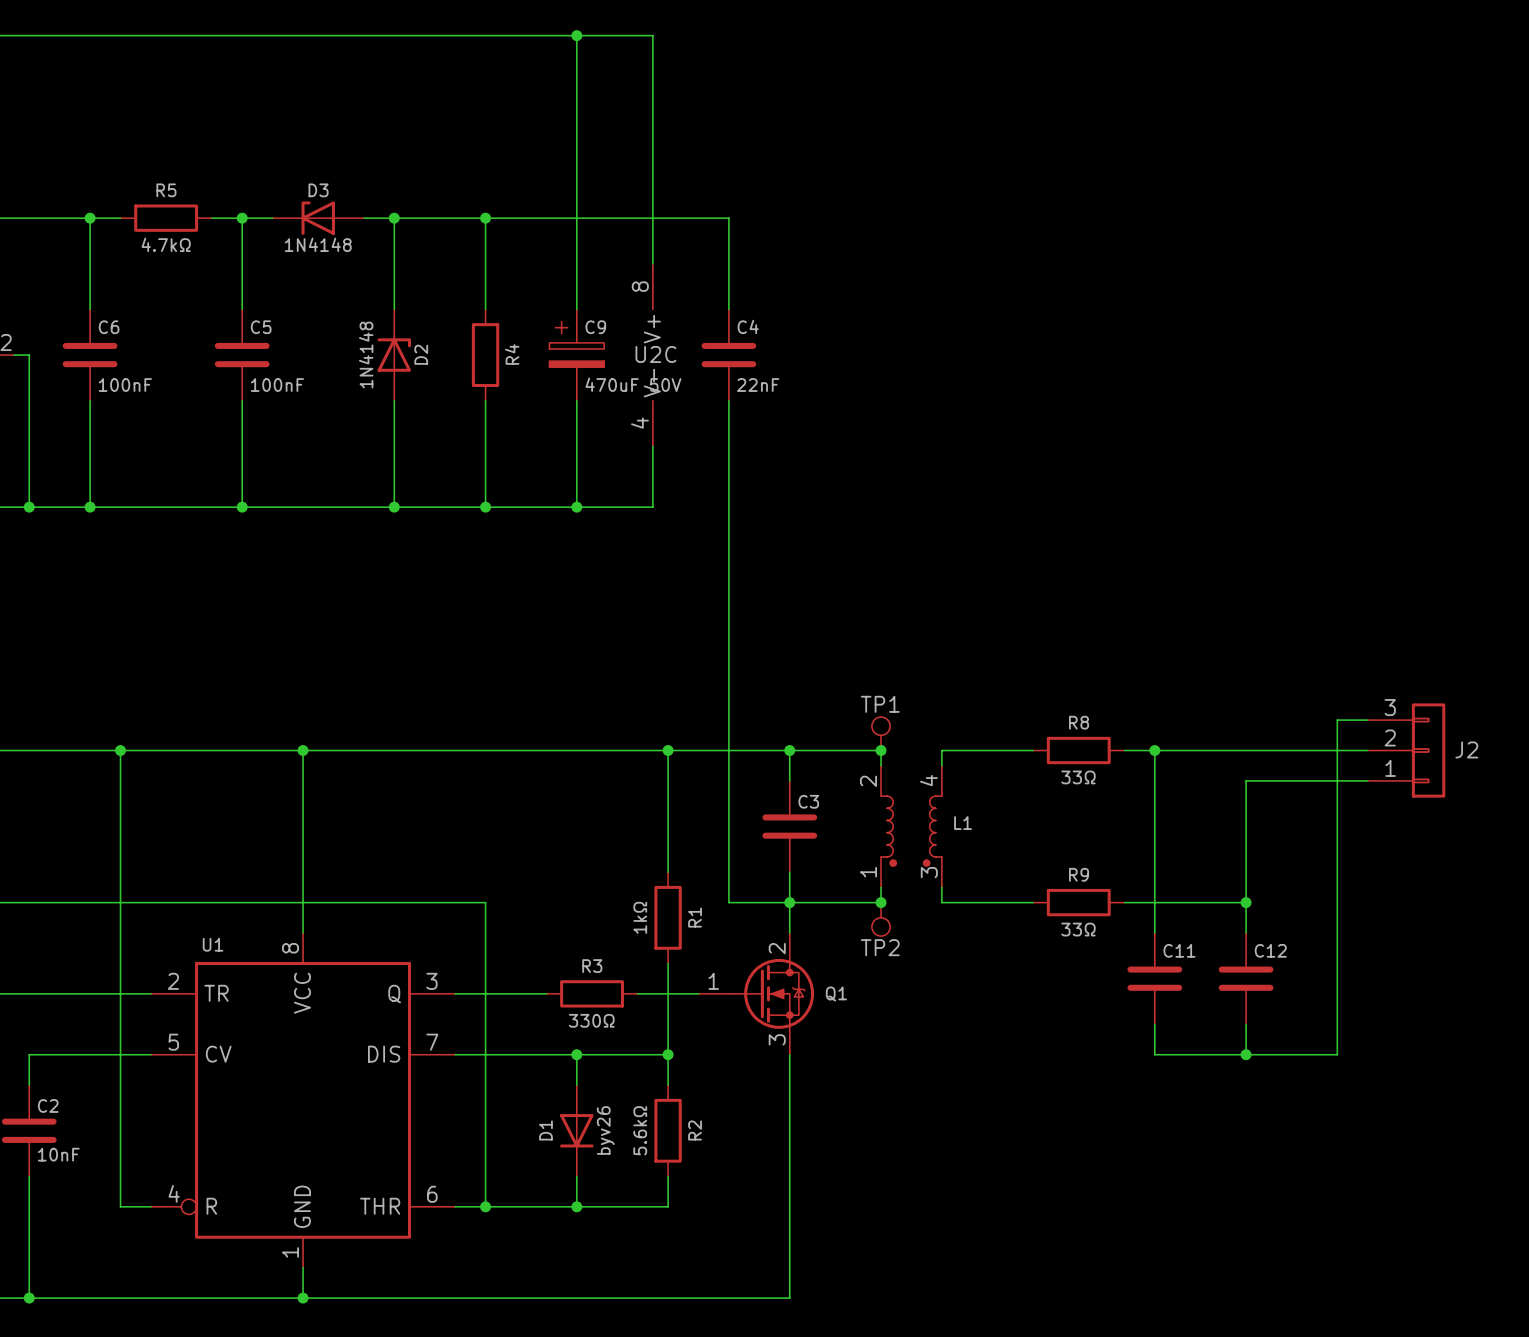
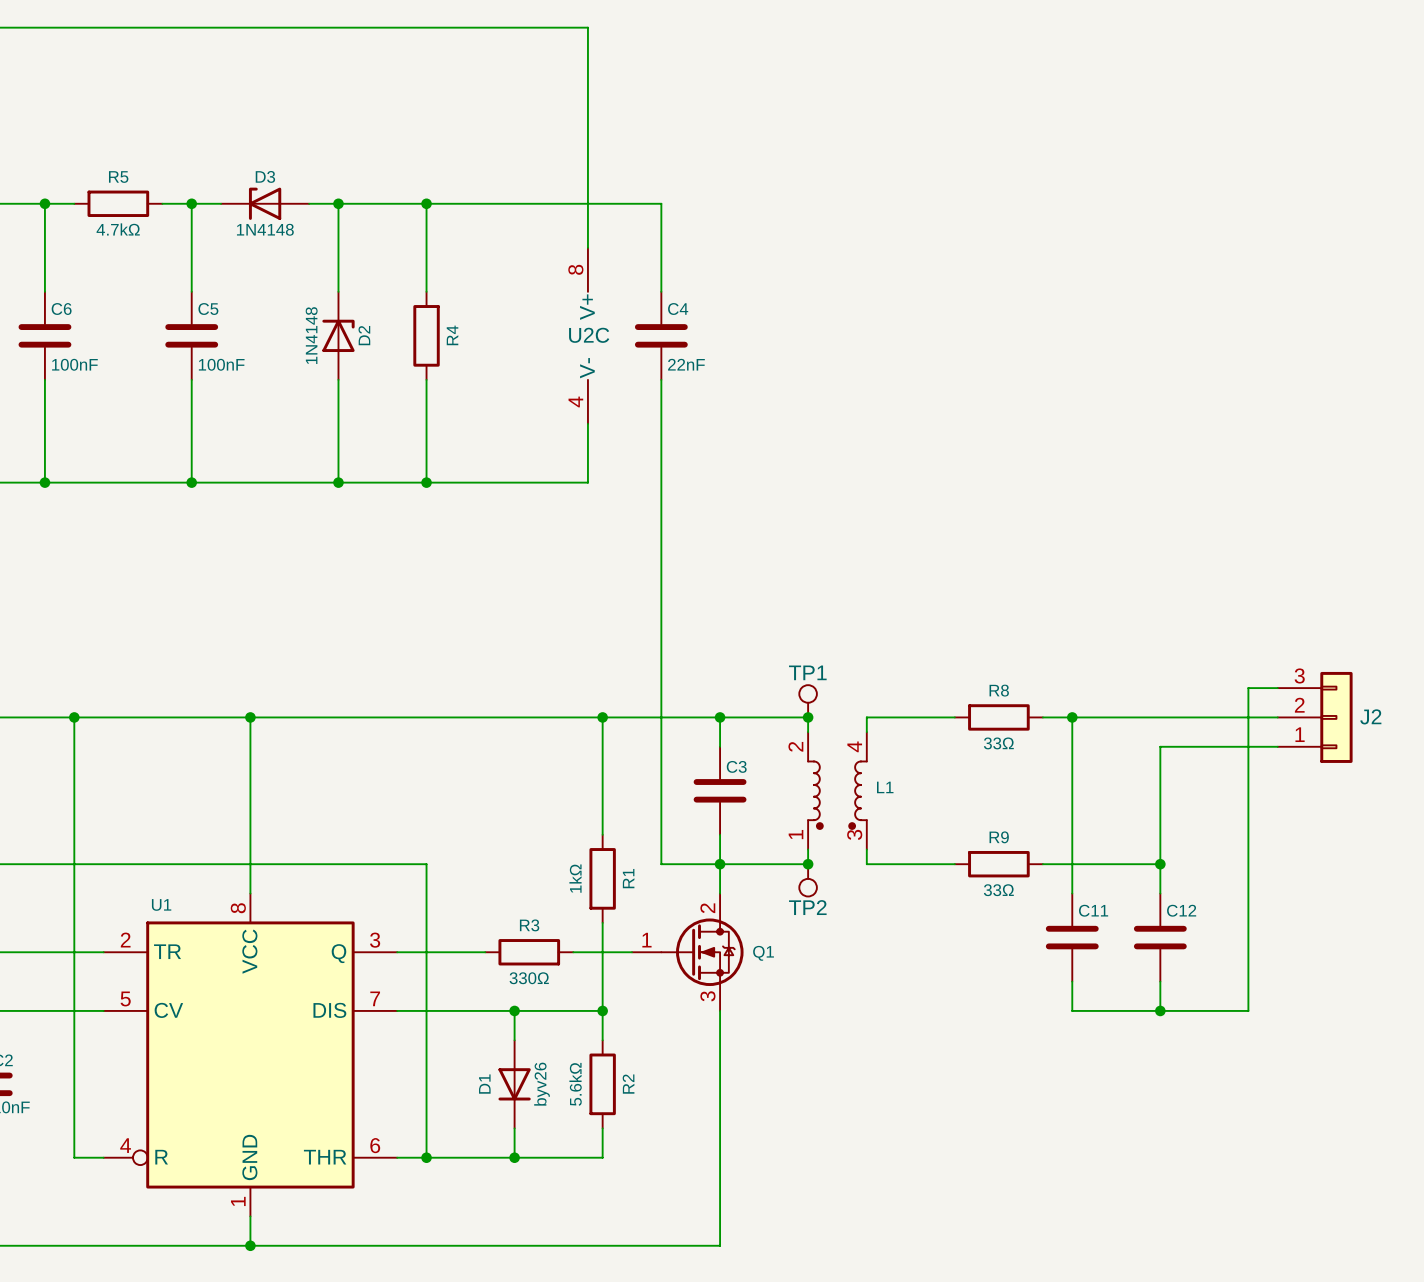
wire: (576, 35) (576, 309) -> none
junction: (576, 35) -> none
C9: 470uF 50V (576, 355) -> none
wire: (576, 400) (576, 507) -> none
junction: (576, 507) -> none

